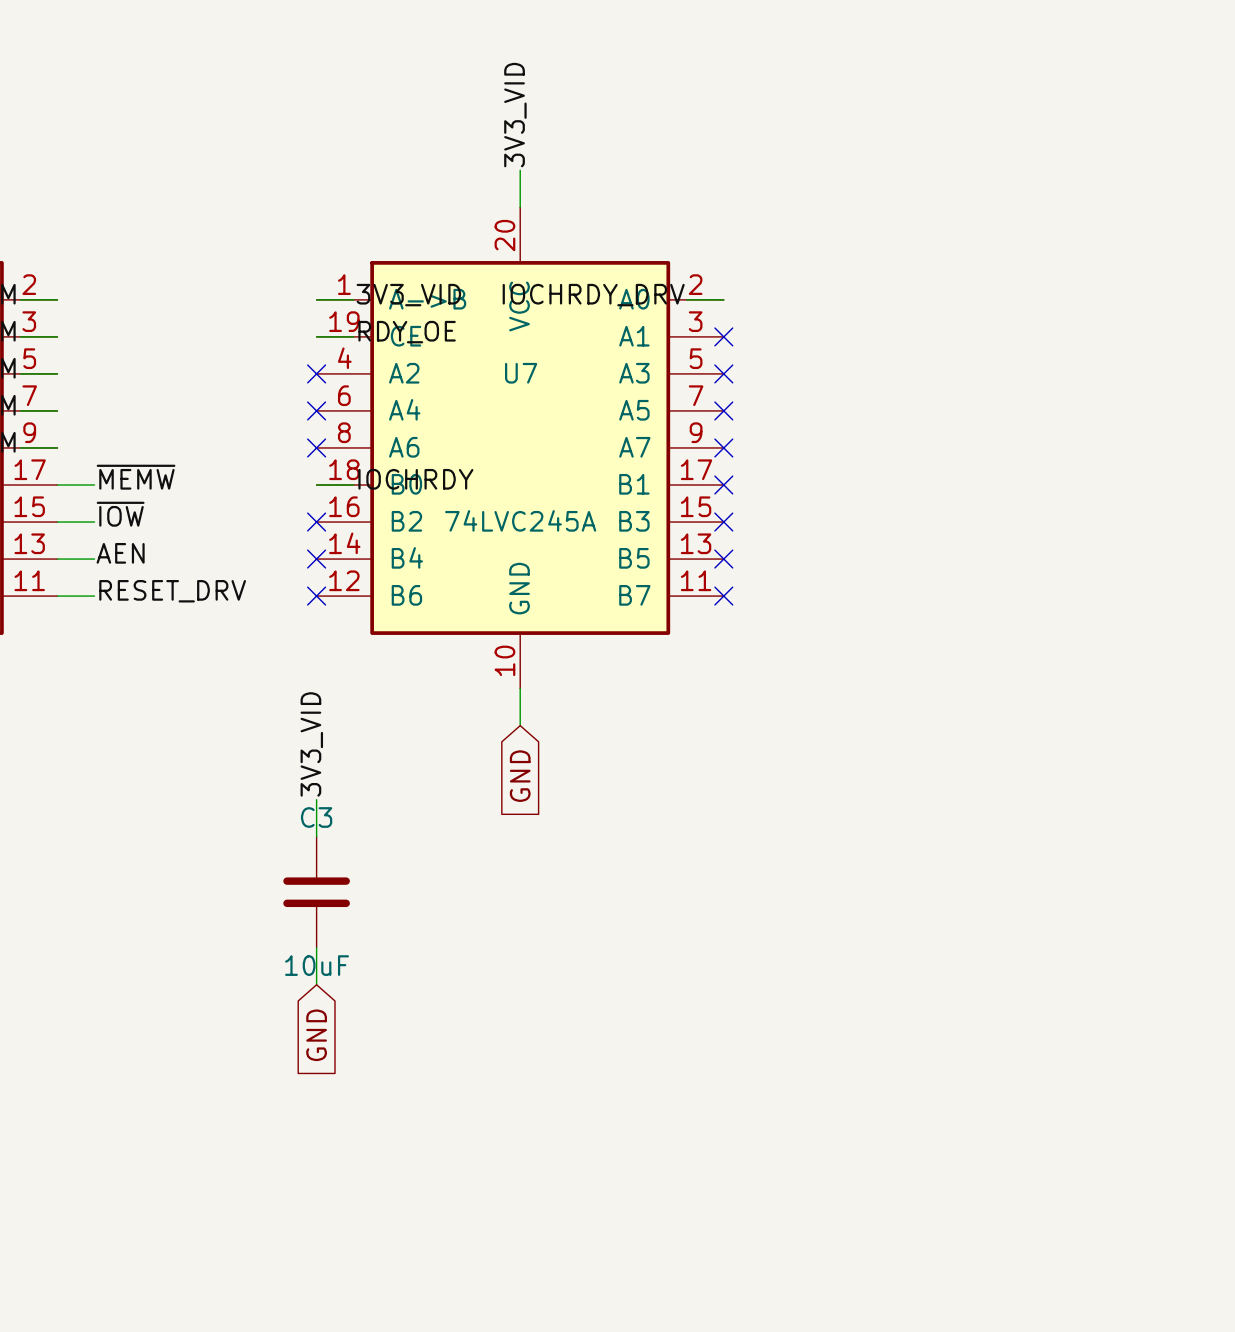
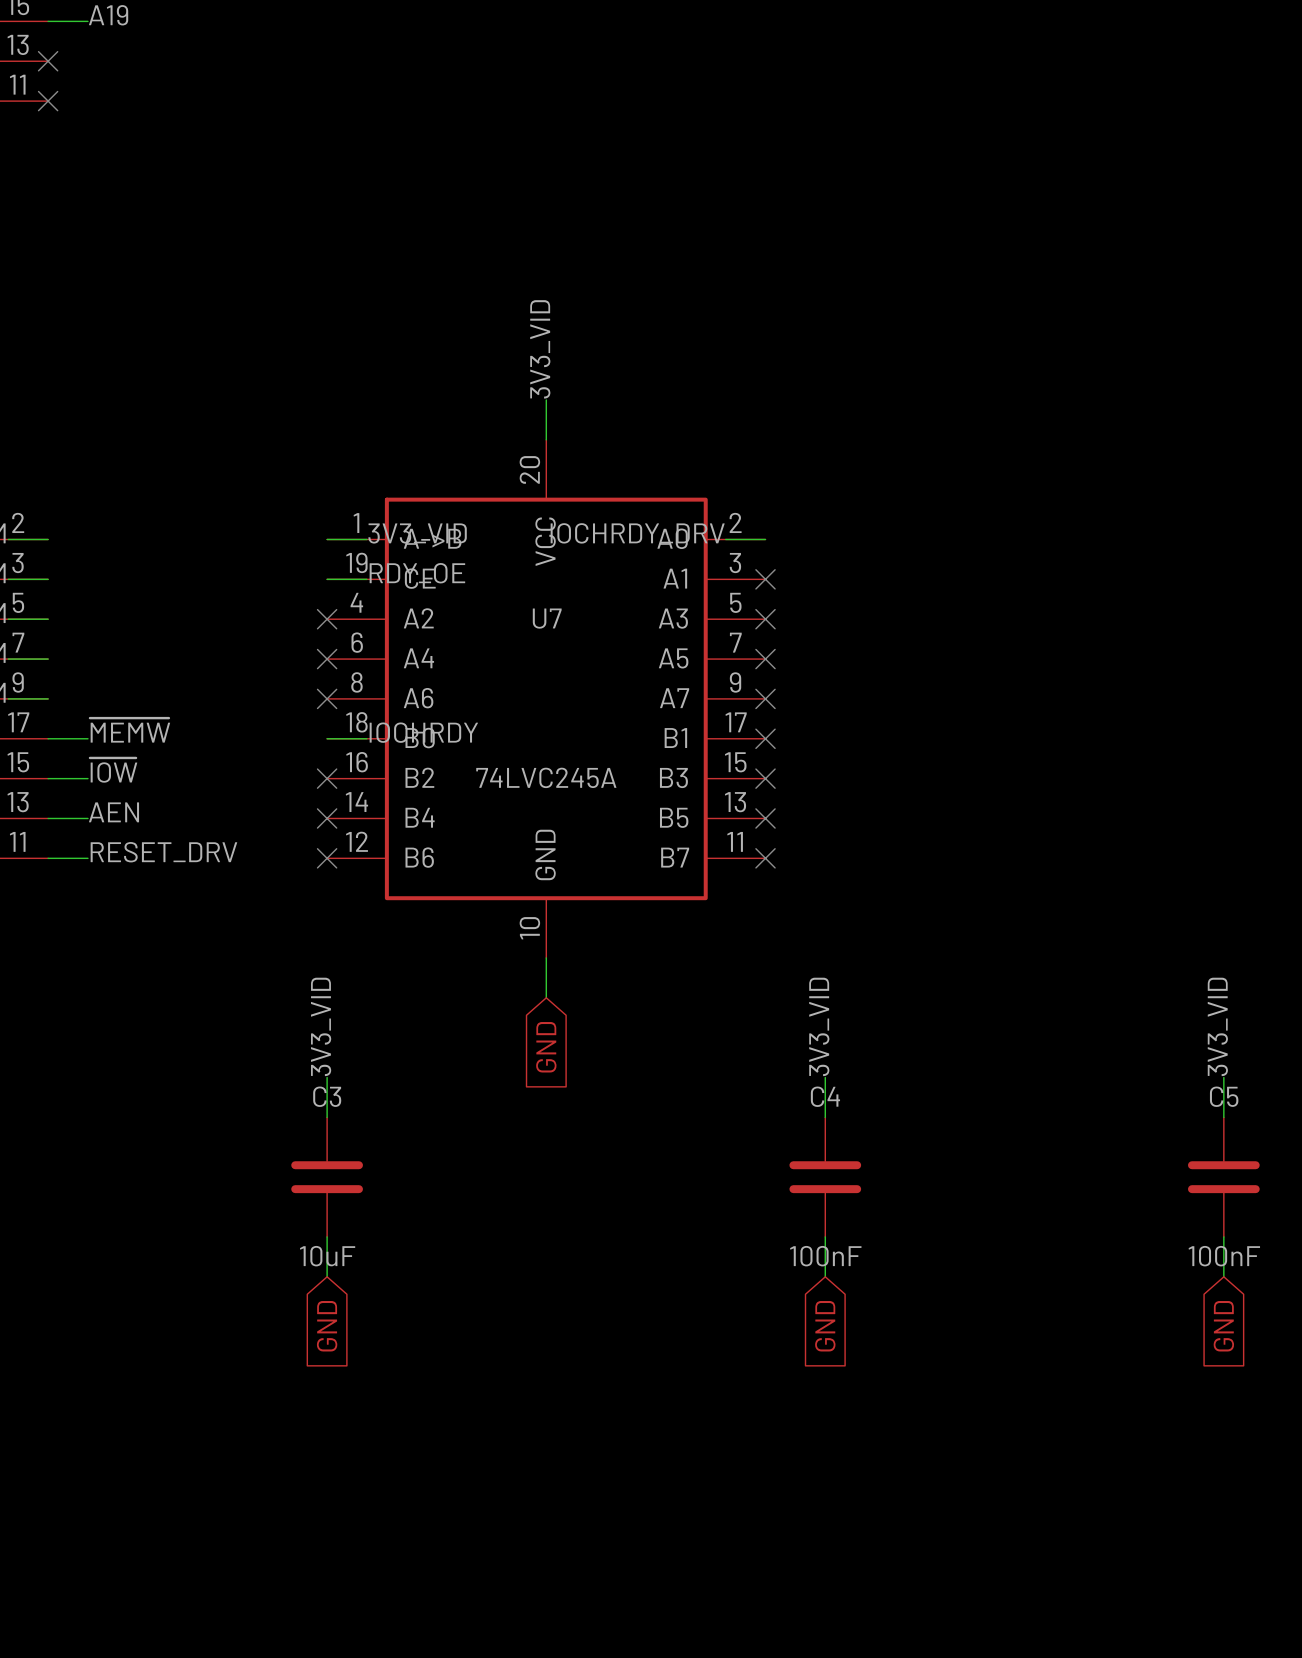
label: none -> 3V3_VID (819, 1026)
label: none -> 3V3_VID (1217, 1026)
wire: none -> (825, 1077) (825, 1117)
wire: none -> (1223, 1077) (1223, 1117)
C4: none -> 100nF (825, 1177)
C5: none -> 100nF (1223, 1177)
wire: none -> (825, 1236) (825, 1276)
wire: none -> (1223, 1236) (1223, 1276)
global label: none -> GND (825, 1326)
global label: none -> GND (1223, 1326)

